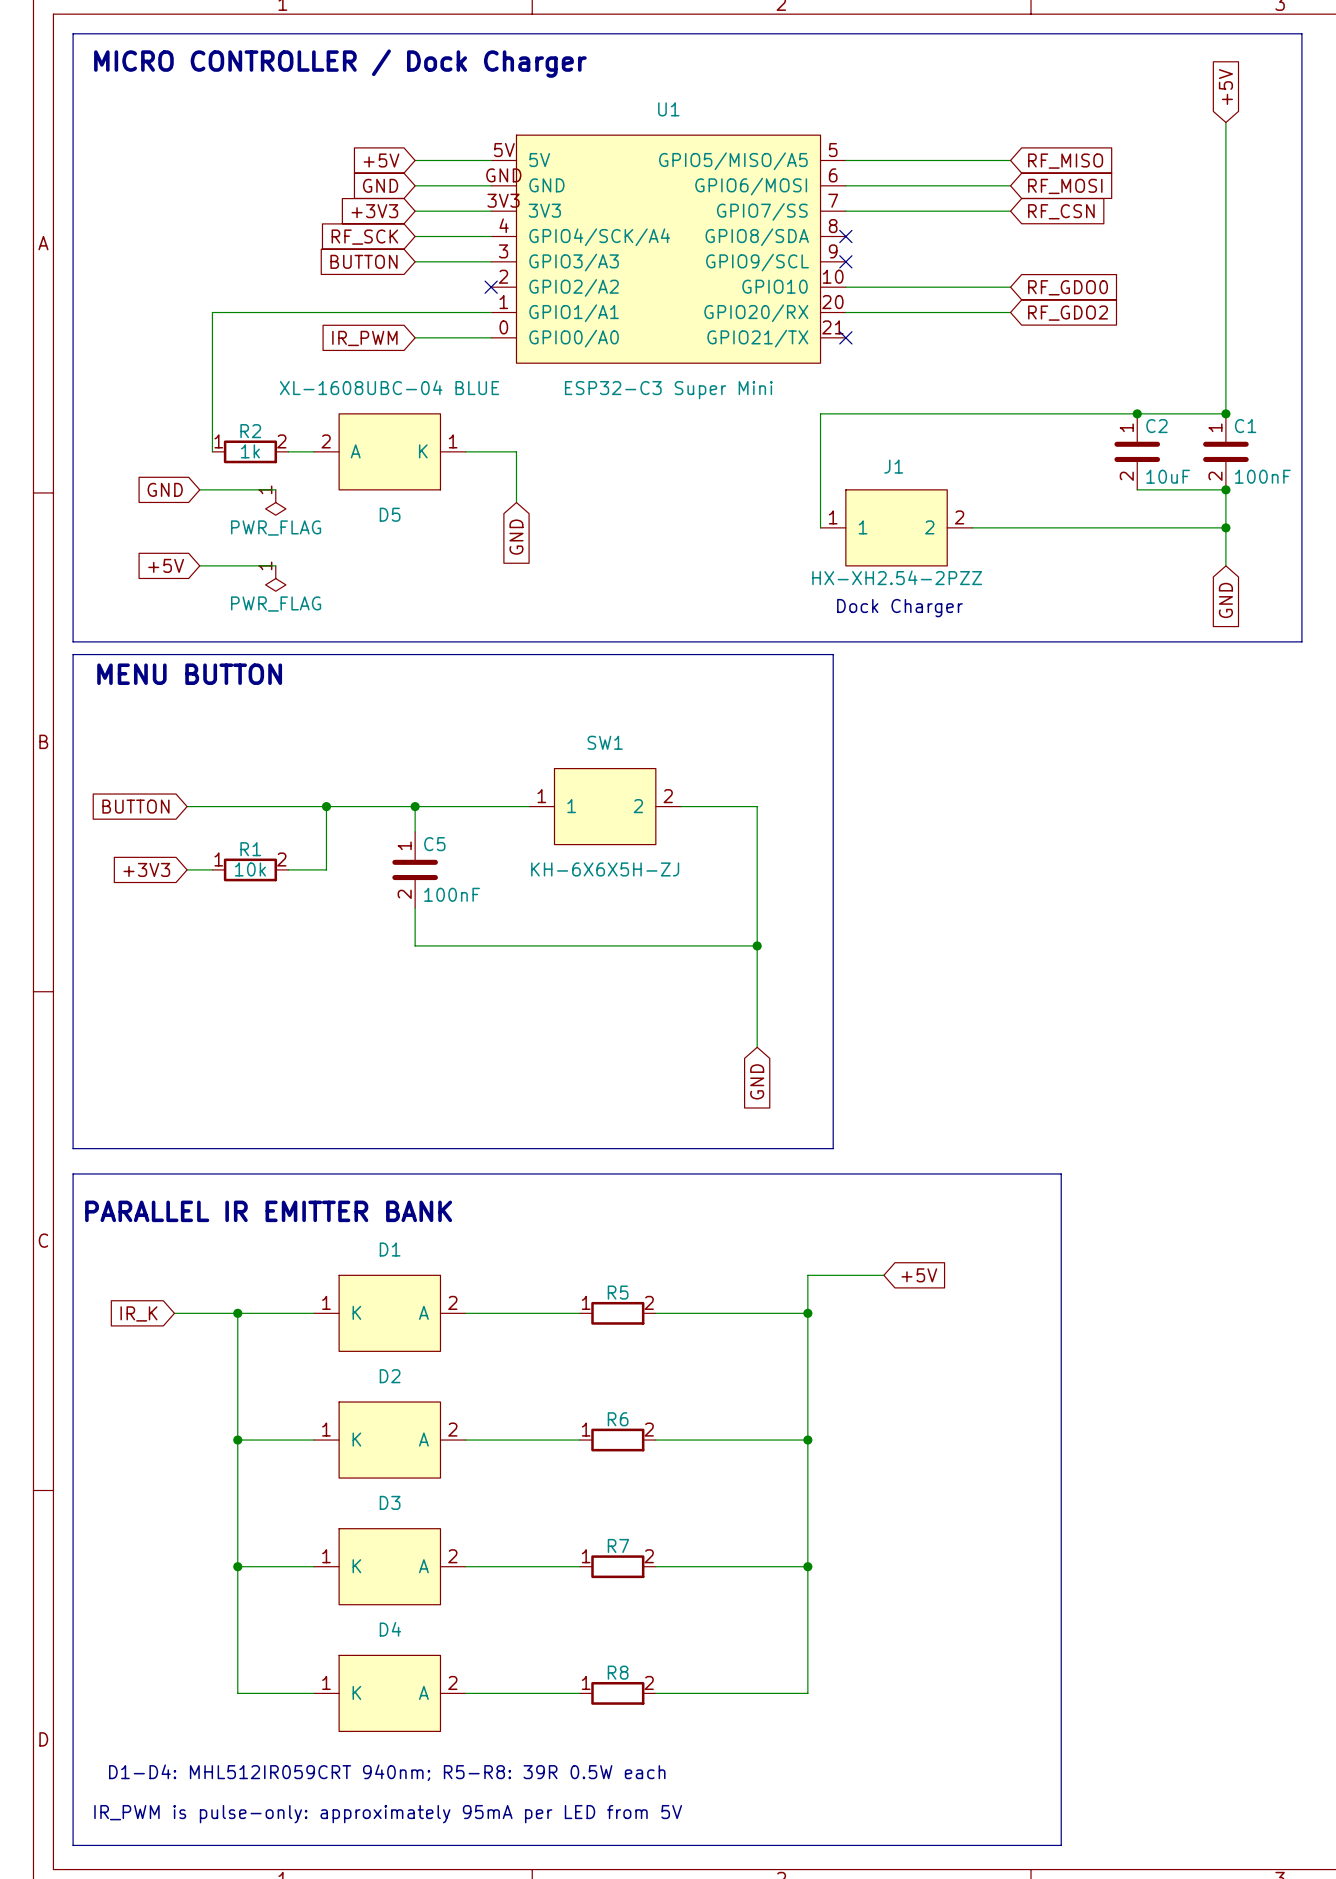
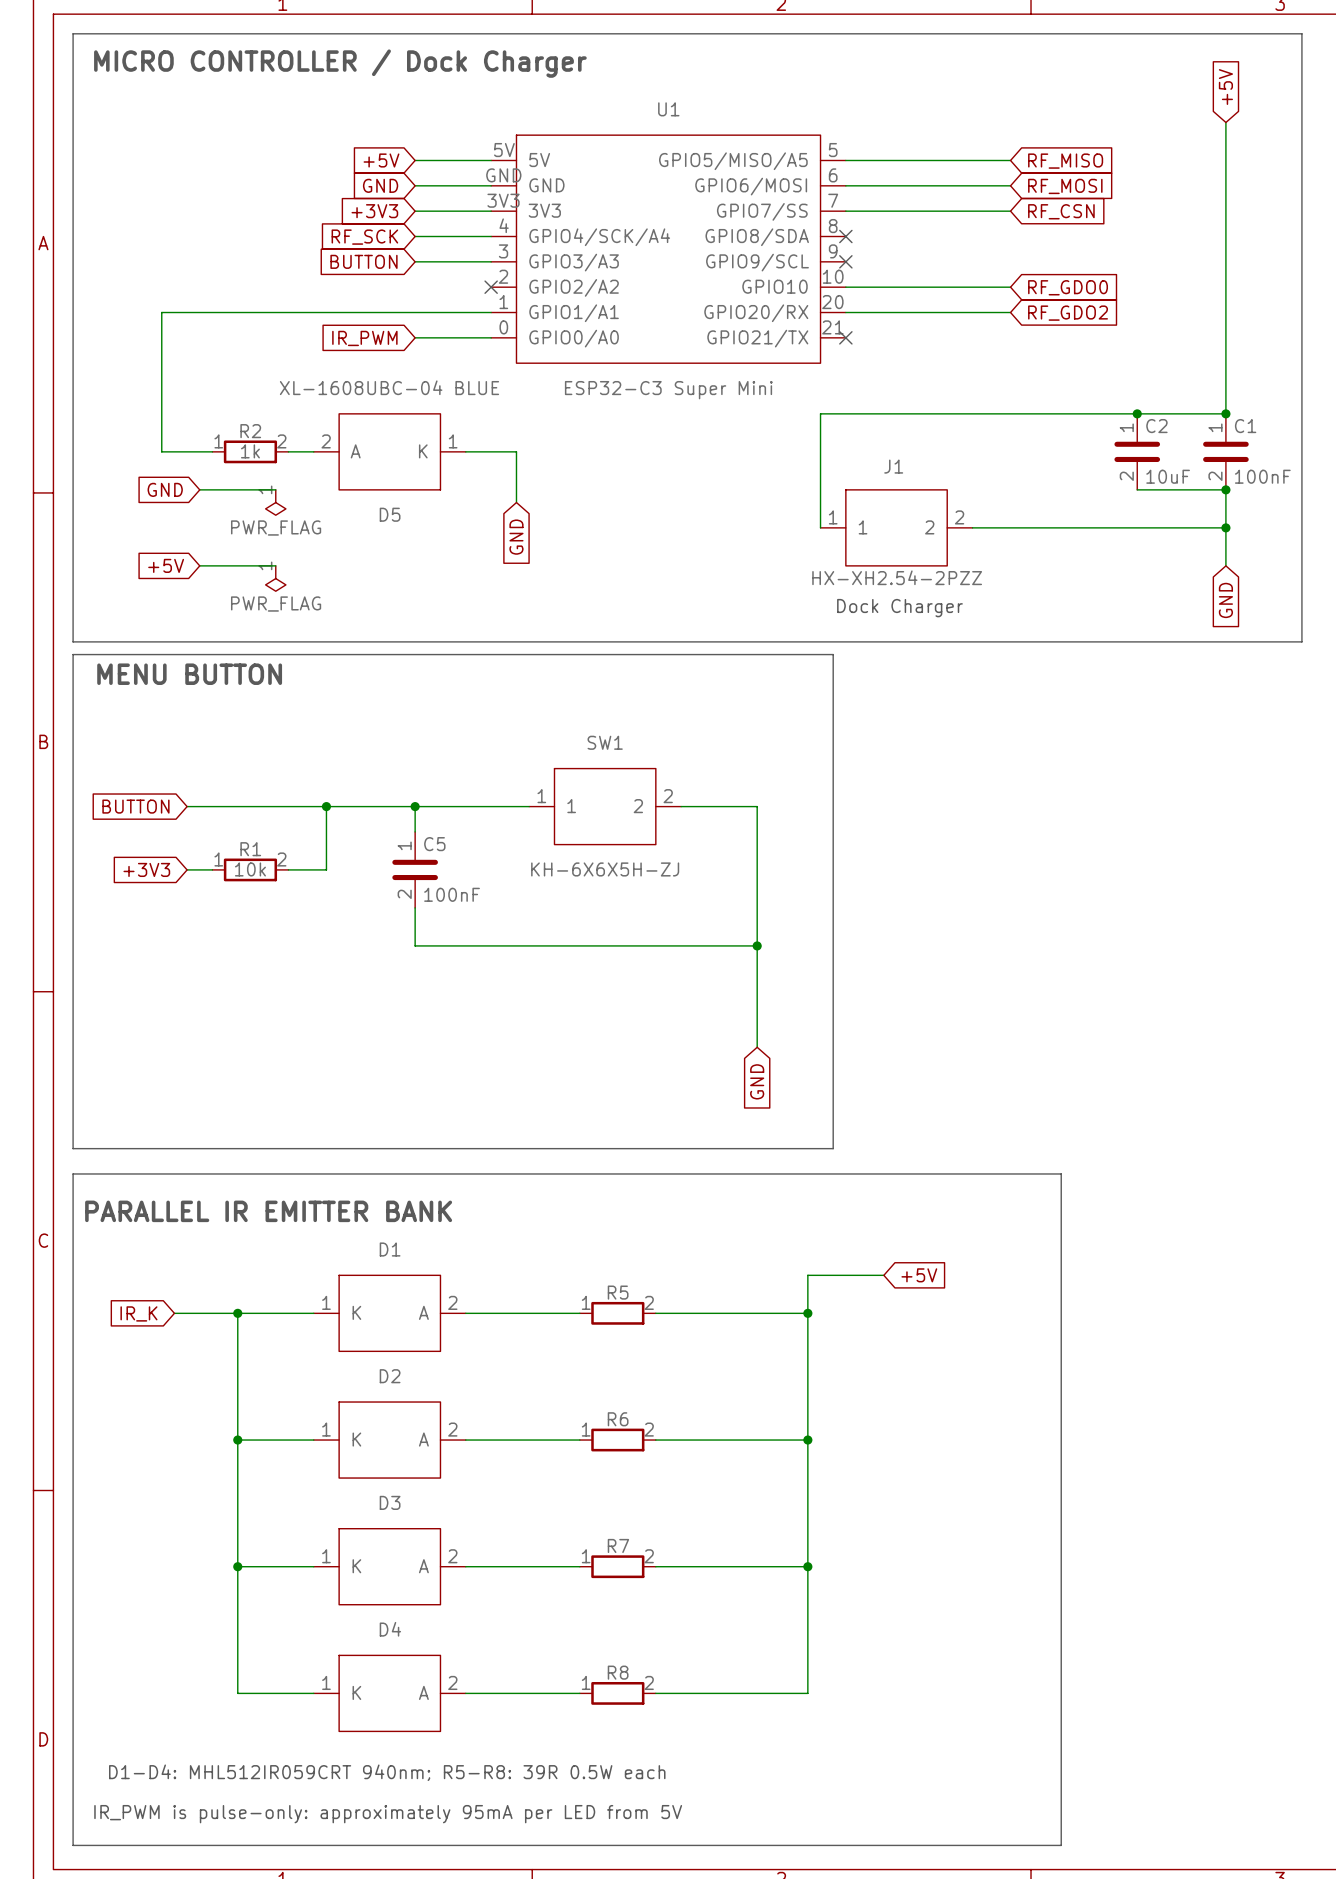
wire: (212, 312) (212, 451) -> (212, 312) (161, 312) (161, 451) (212, 451)

